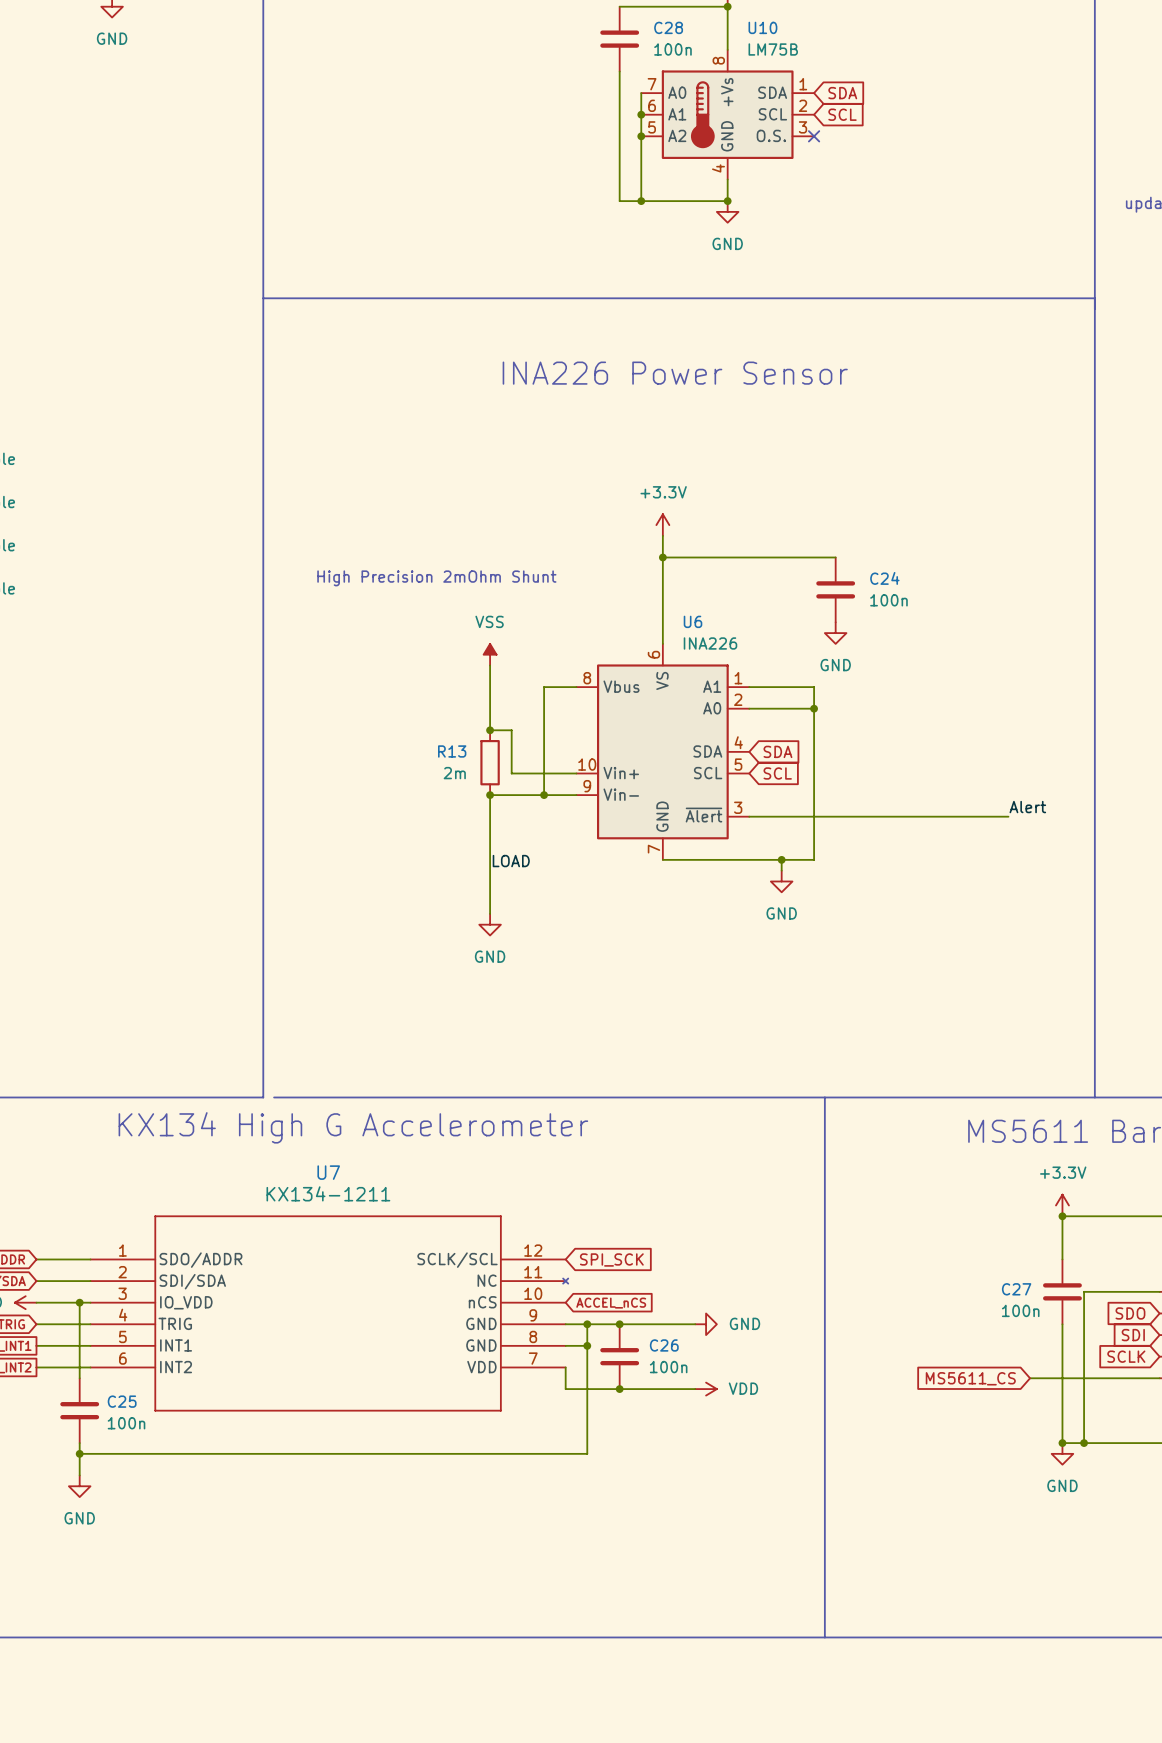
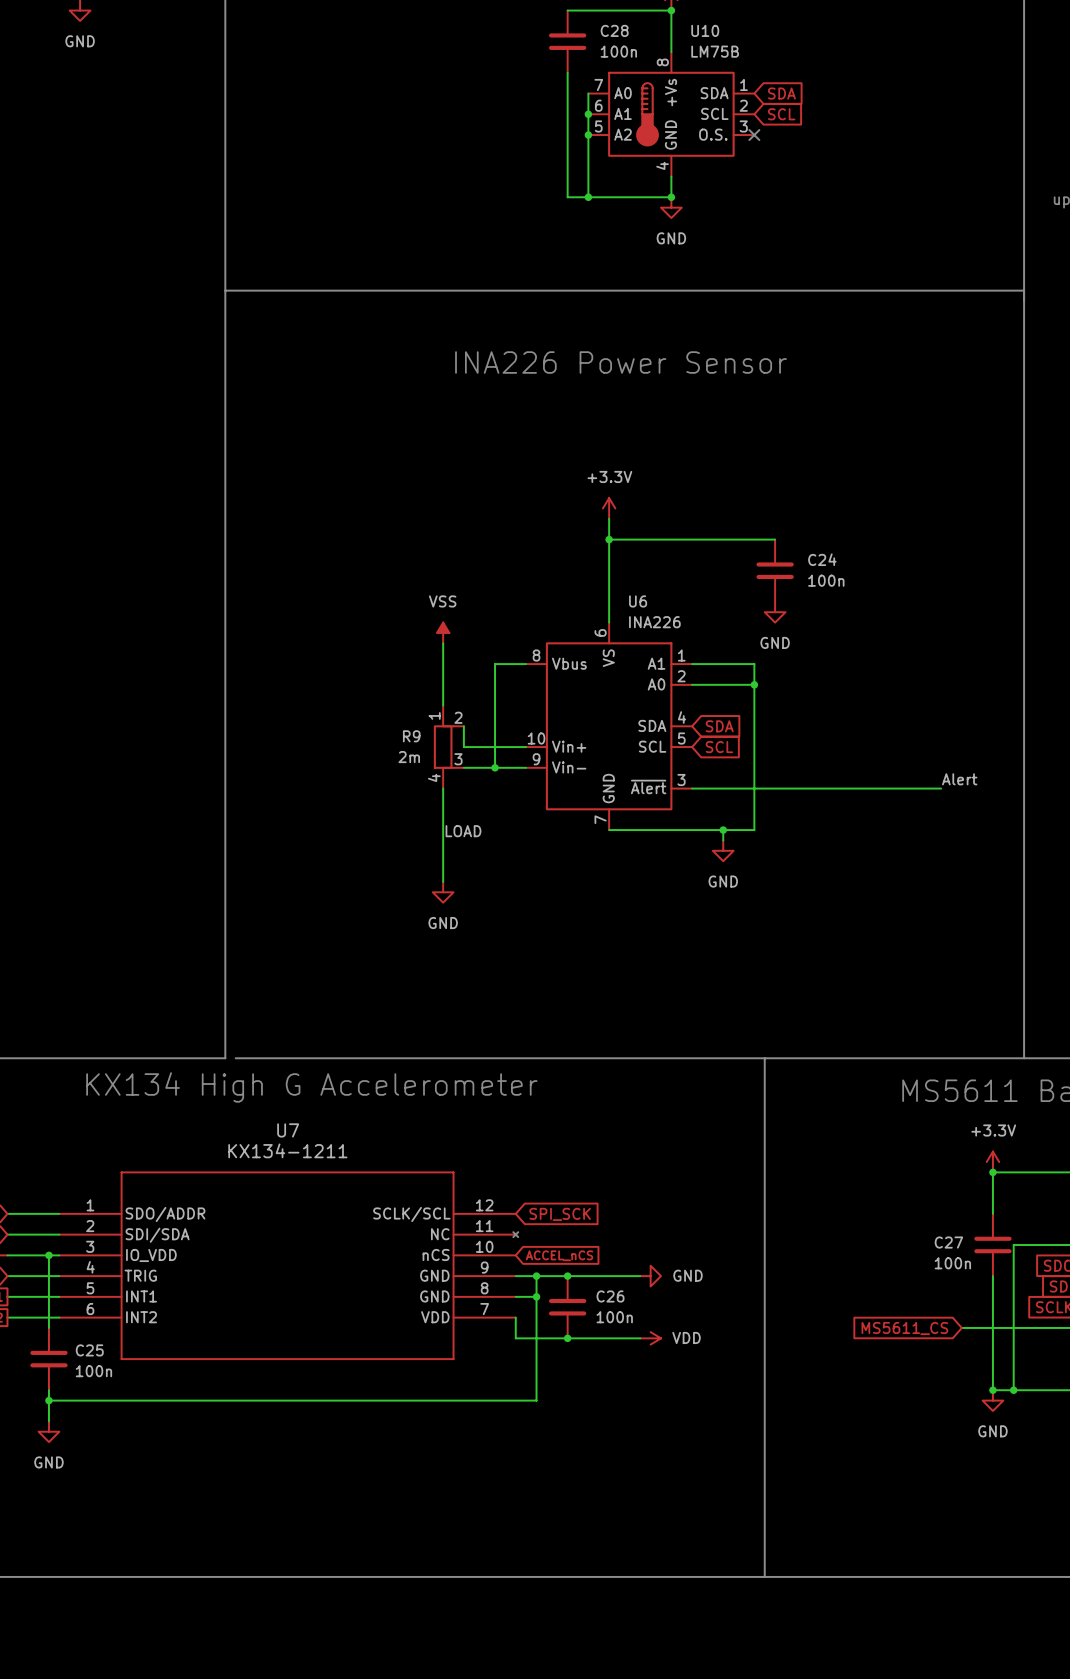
text: High Precision 2mOhm Shunt (436, 578) -> none
wire: (490, 730) (511, 730) (511, 751) -> none
junction: (490, 730) -> none
R13: 2m (490, 762) -> none
R9: none -> 2m (448, 747)
junction: (490, 795) -> none

